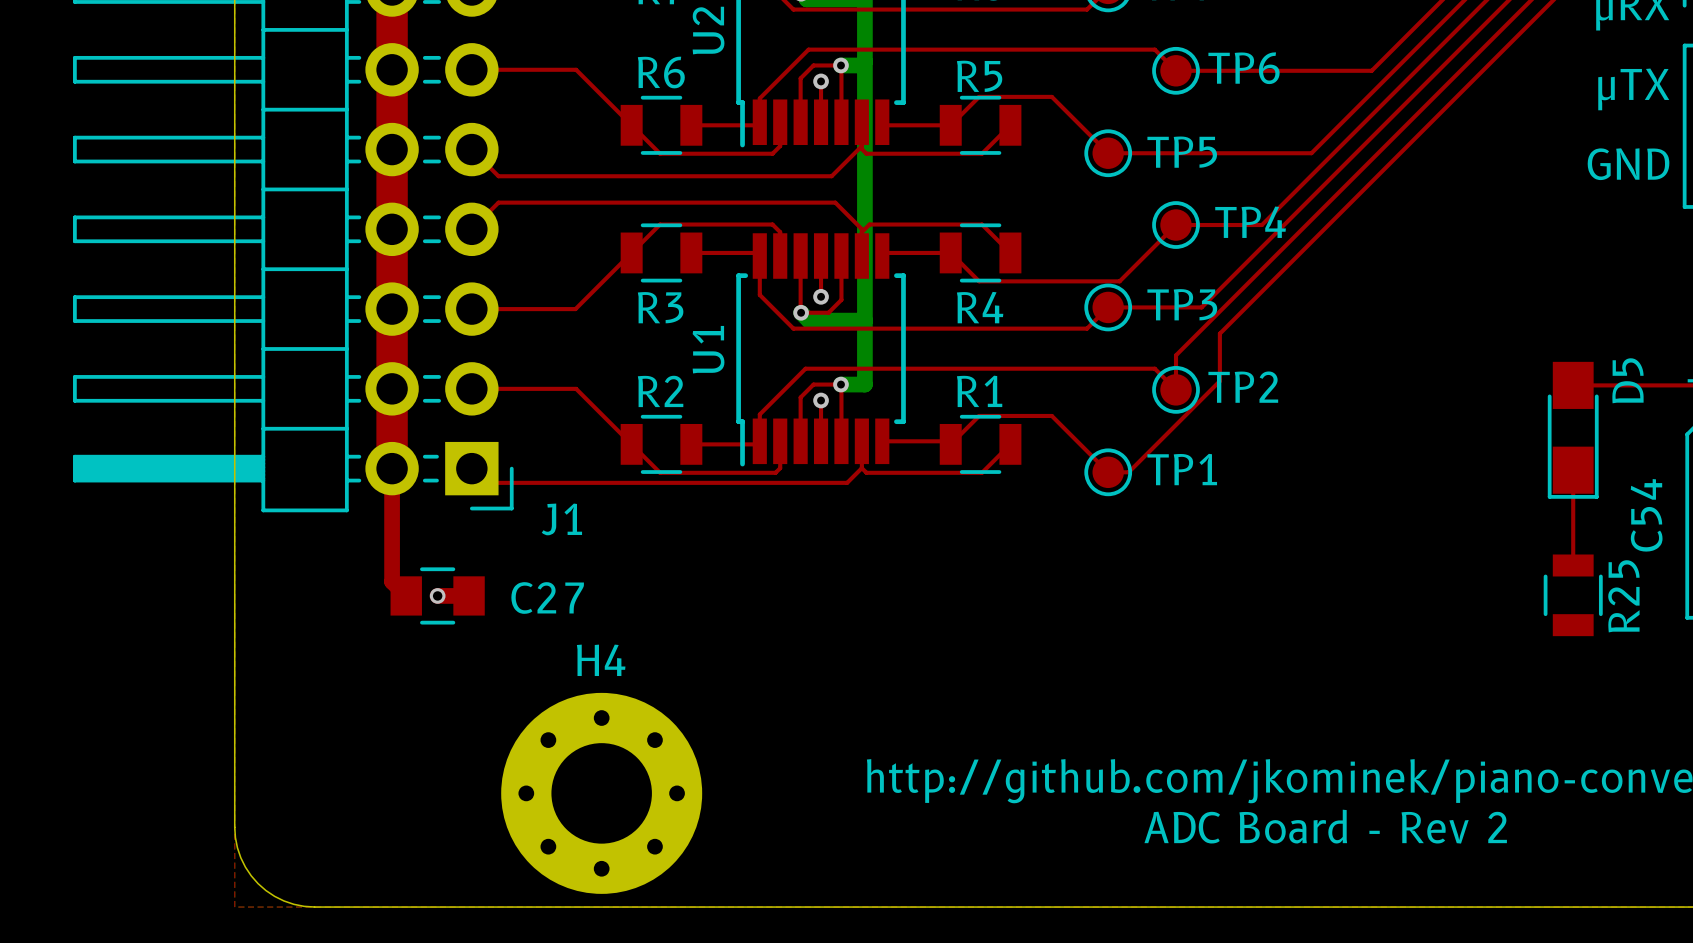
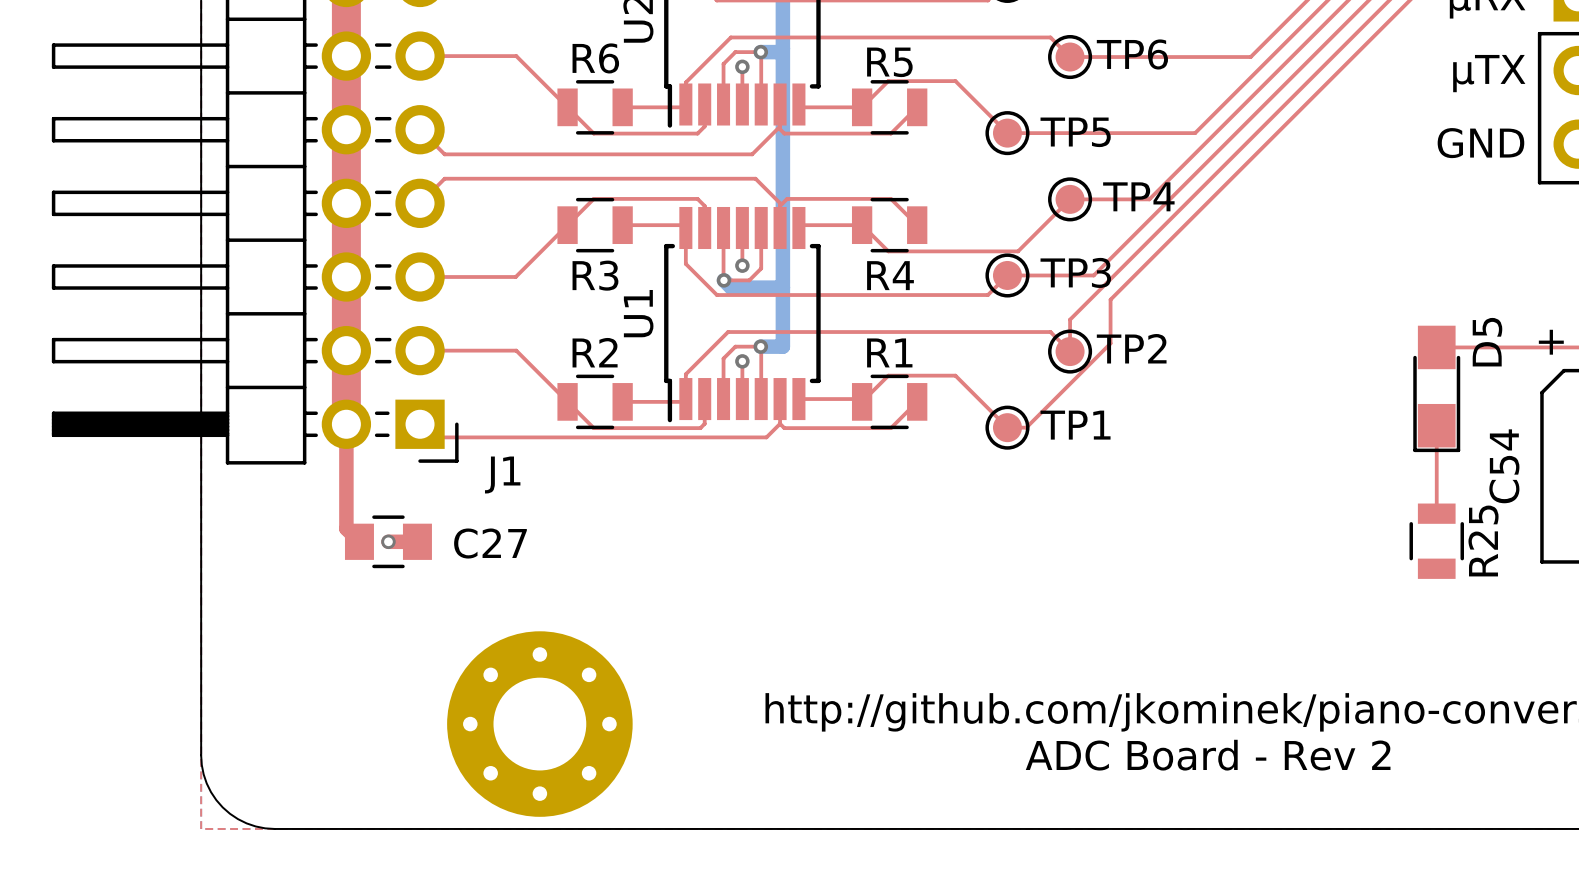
H4 name: H4 (601, 660) -> none

